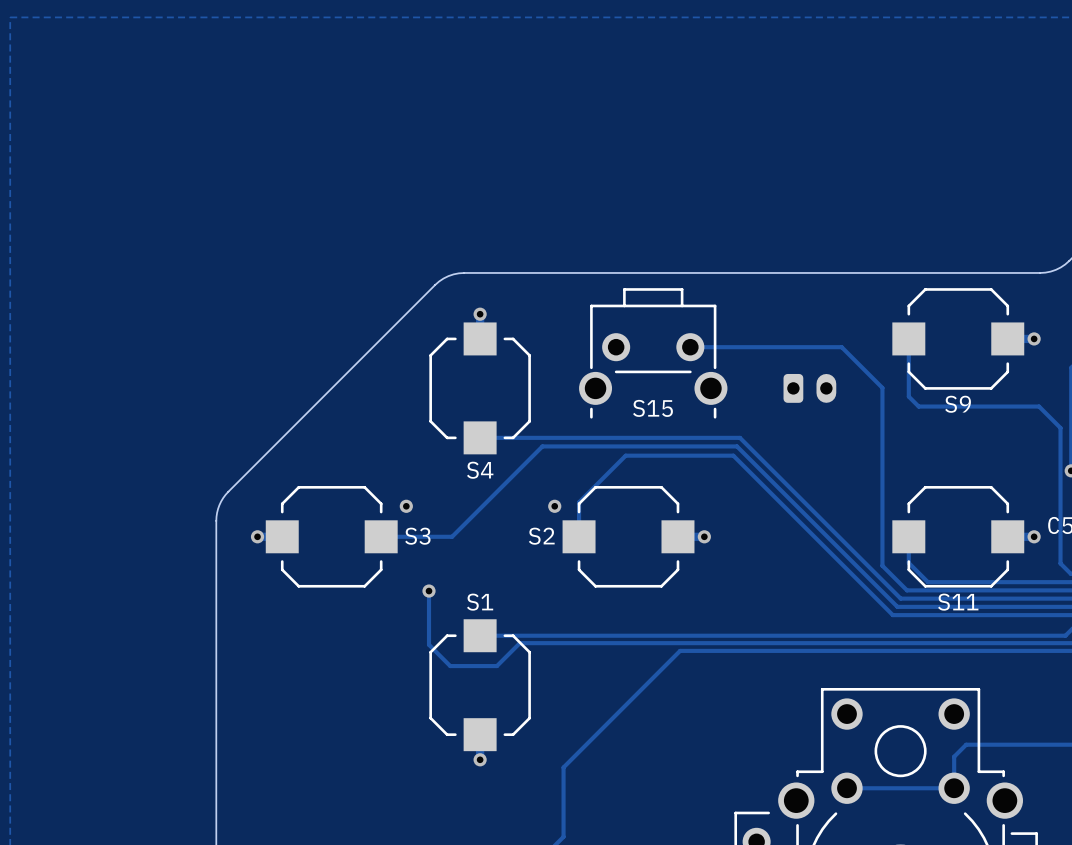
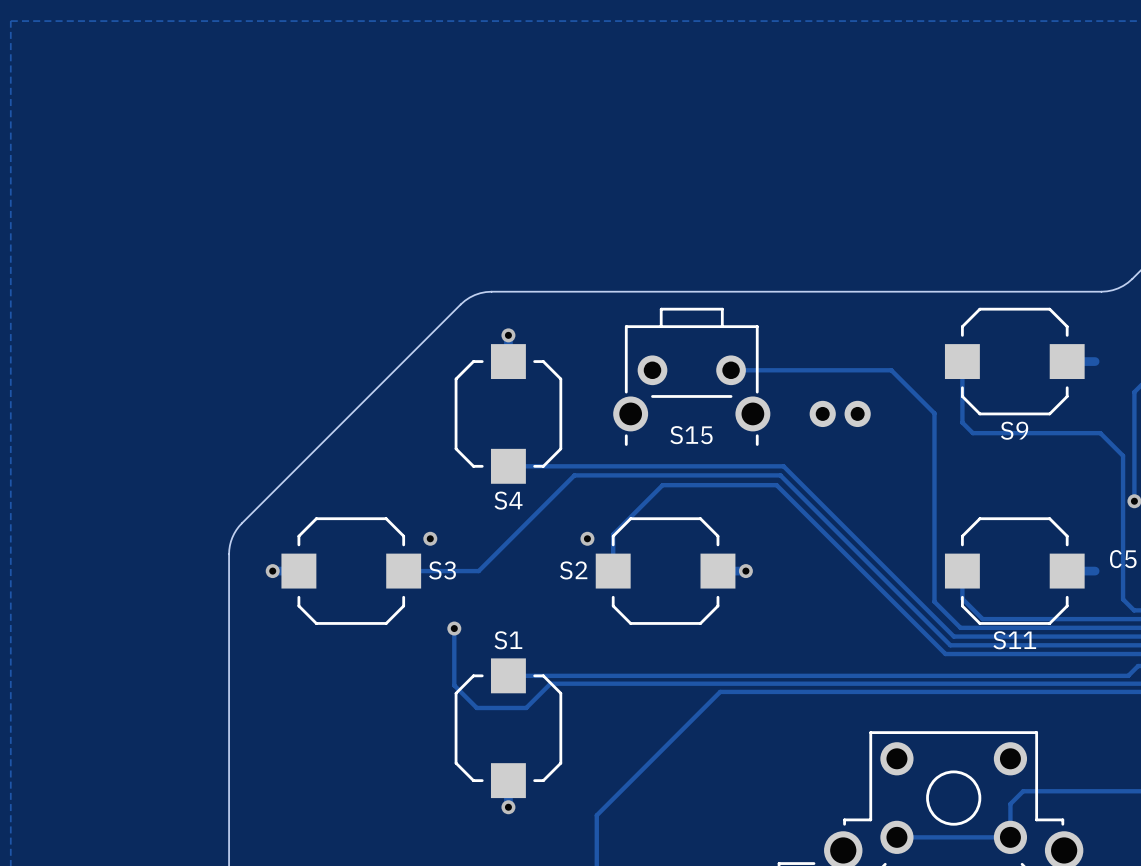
via: (1034, 338) -> none
part: none -> (840, 413)
part: (809, 388) -> none
via: (1034, 536) -> none

